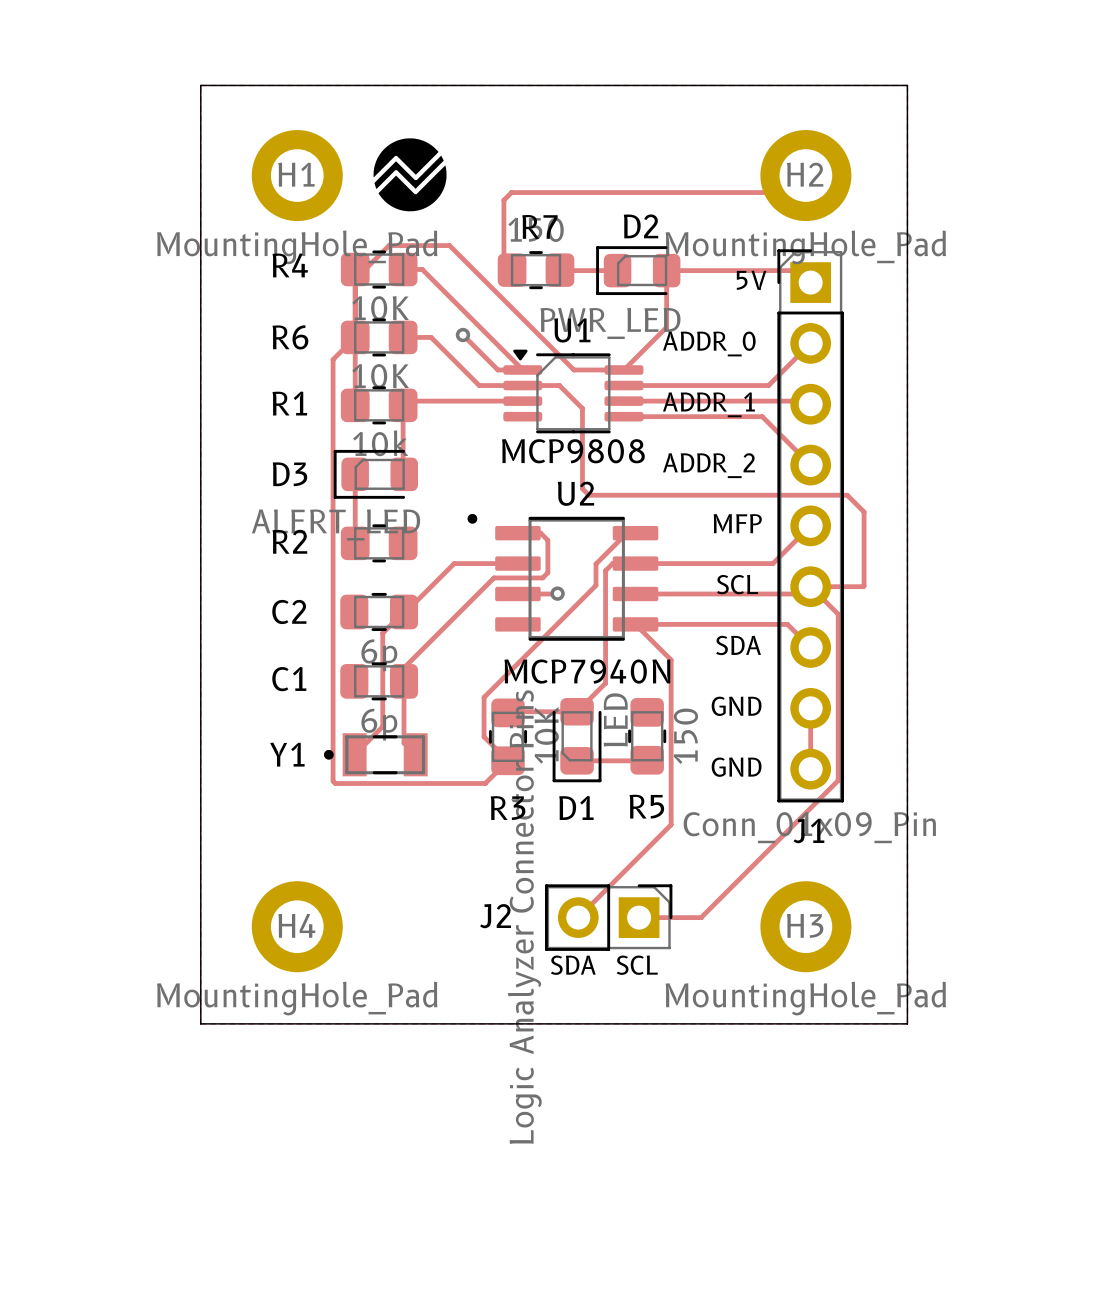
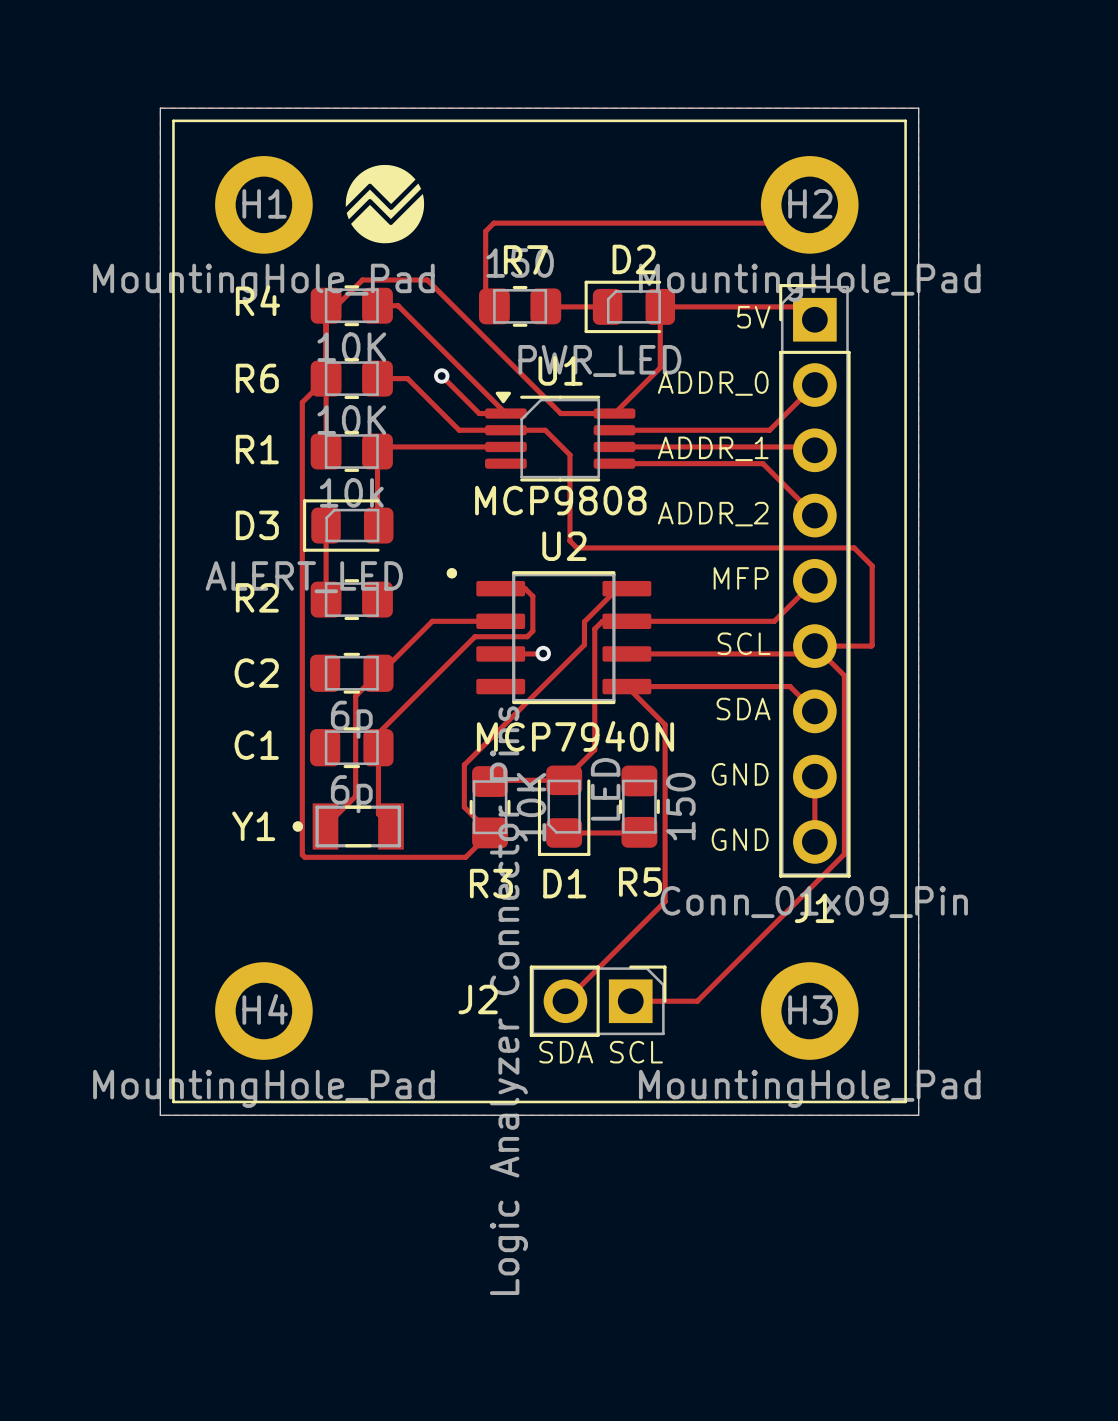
line: none -> (173, 120) (905, 120) (905, 1101) (173, 1101) (173, 120)

